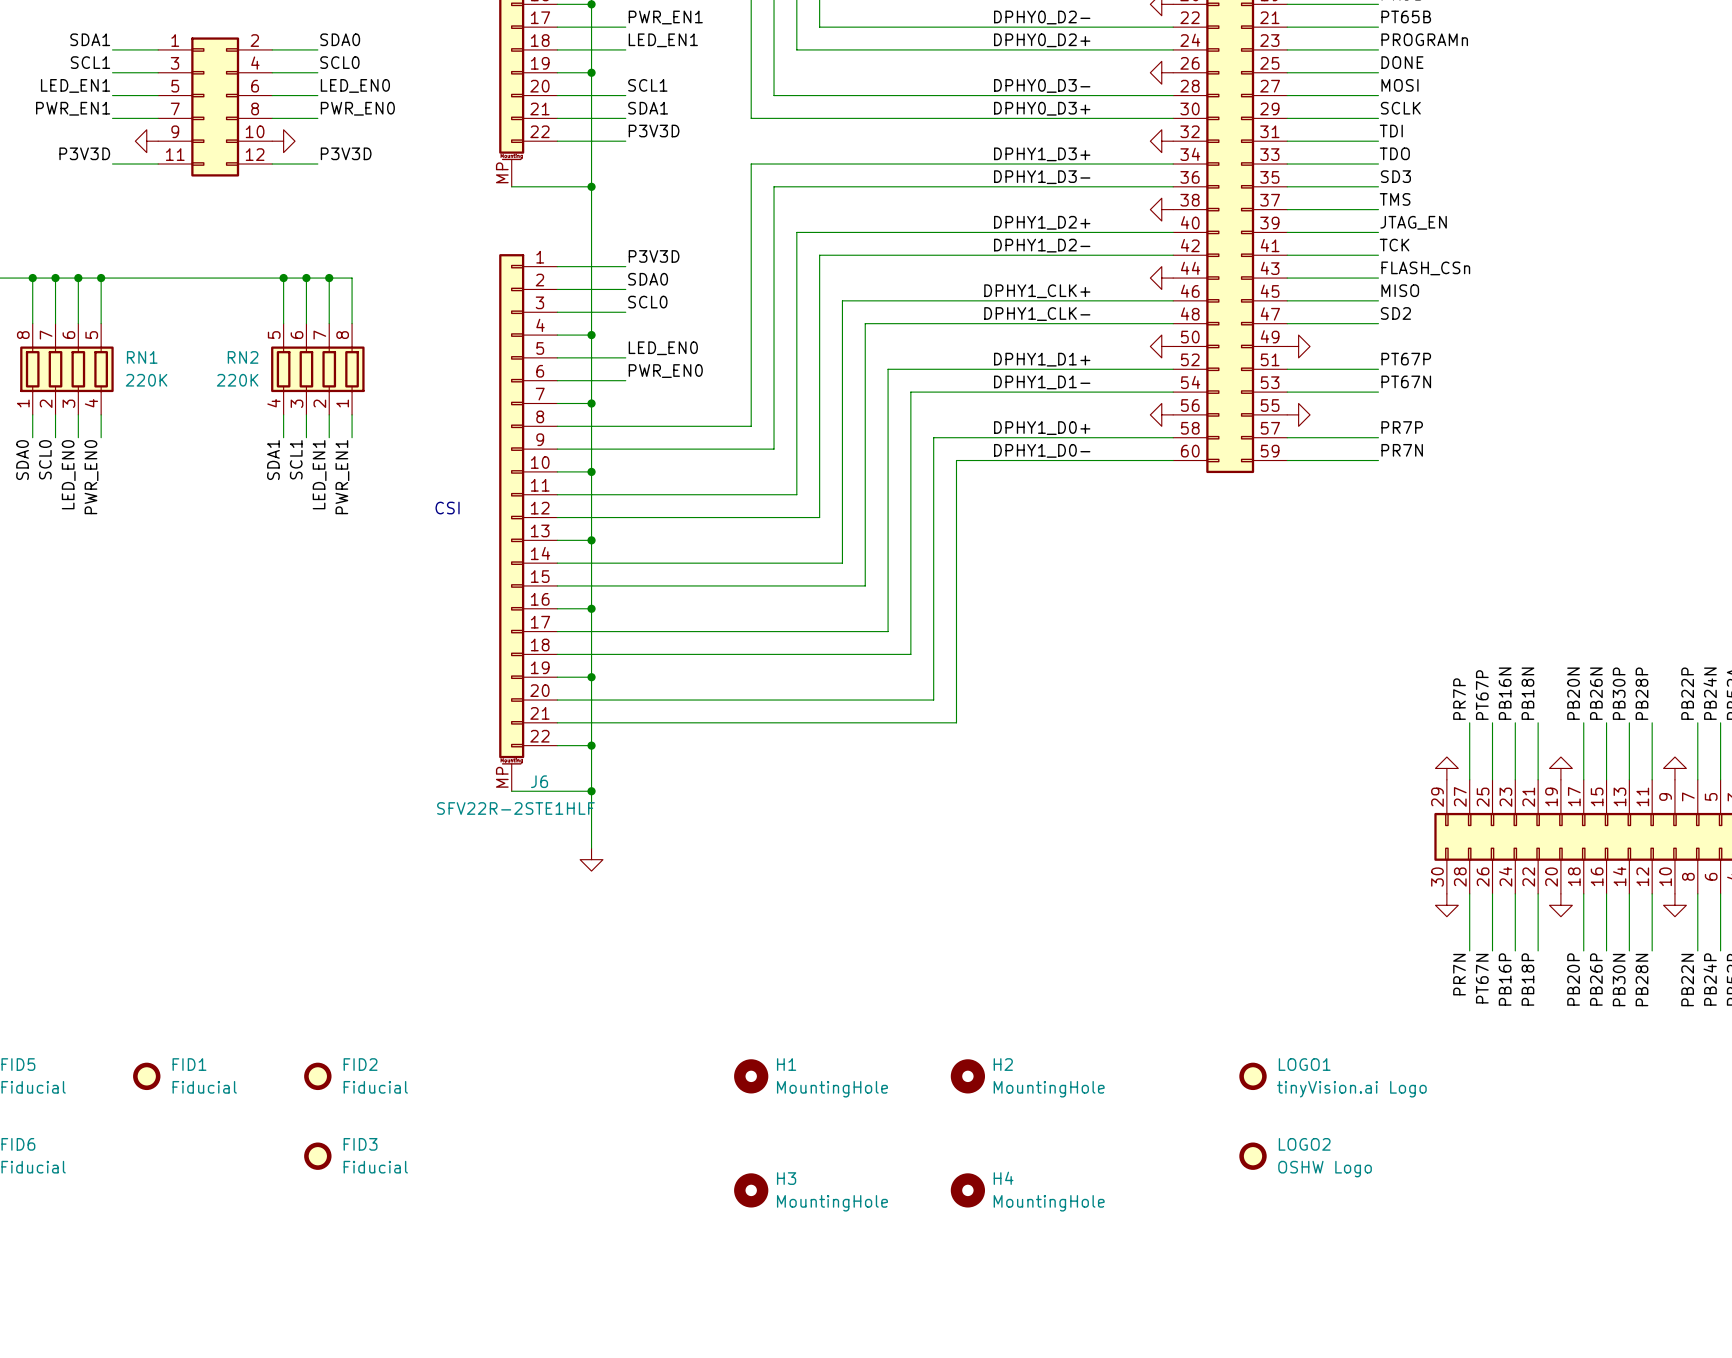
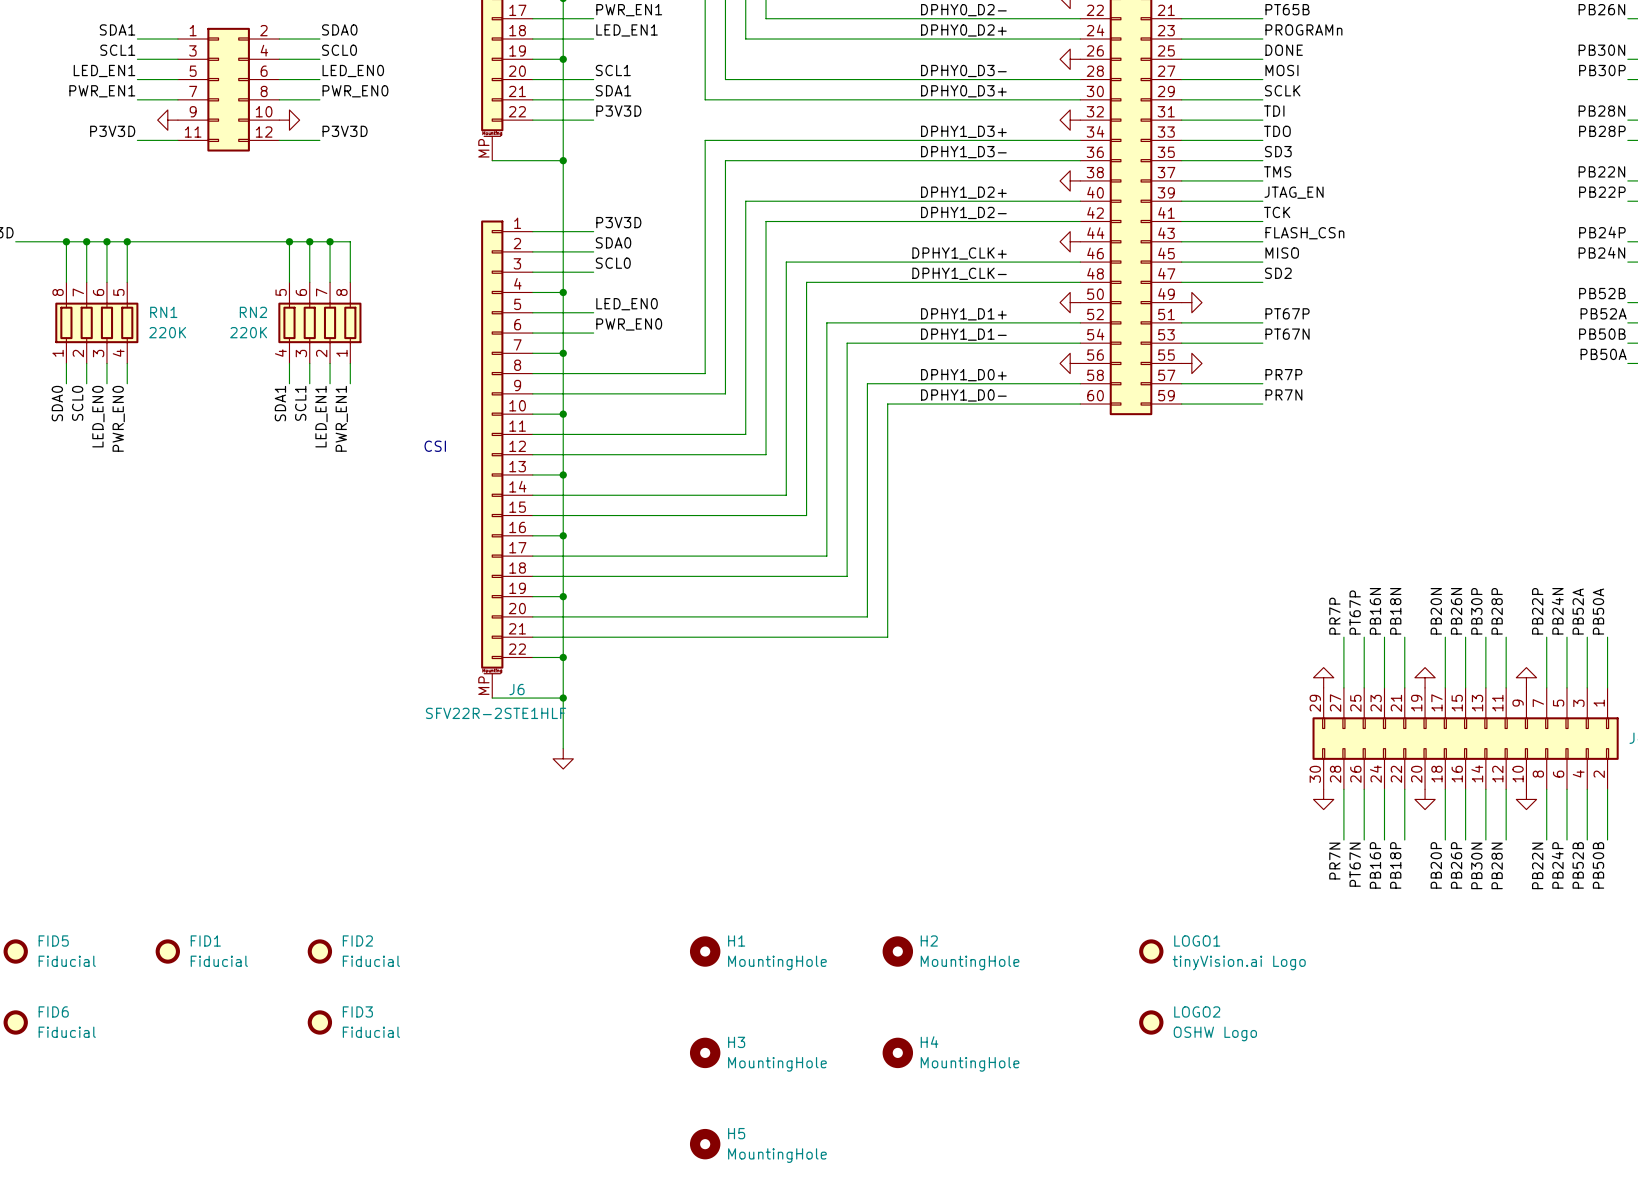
H5: none -> MountingHole (705, 1144)

